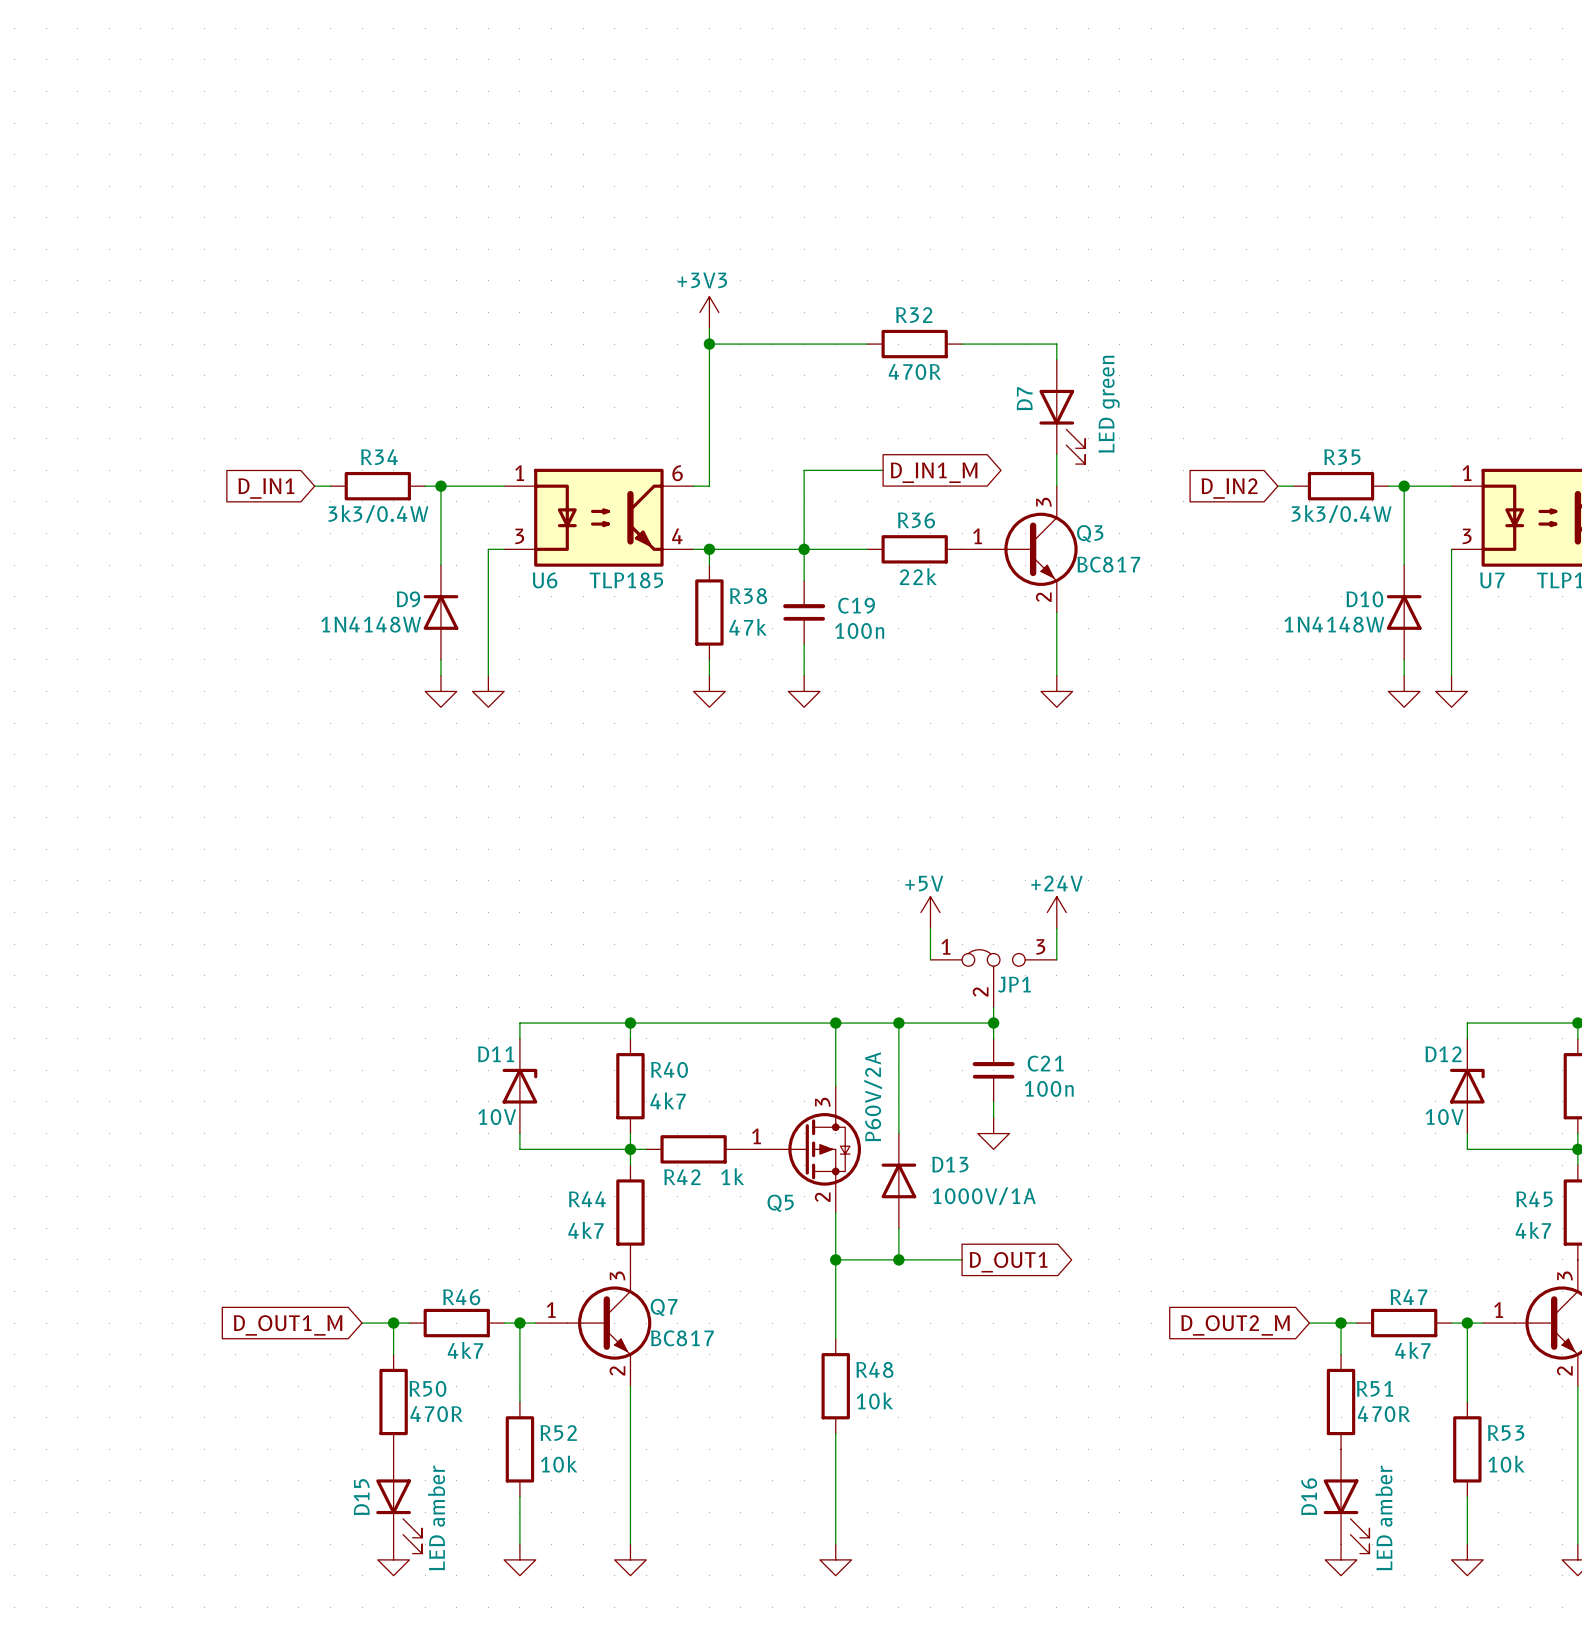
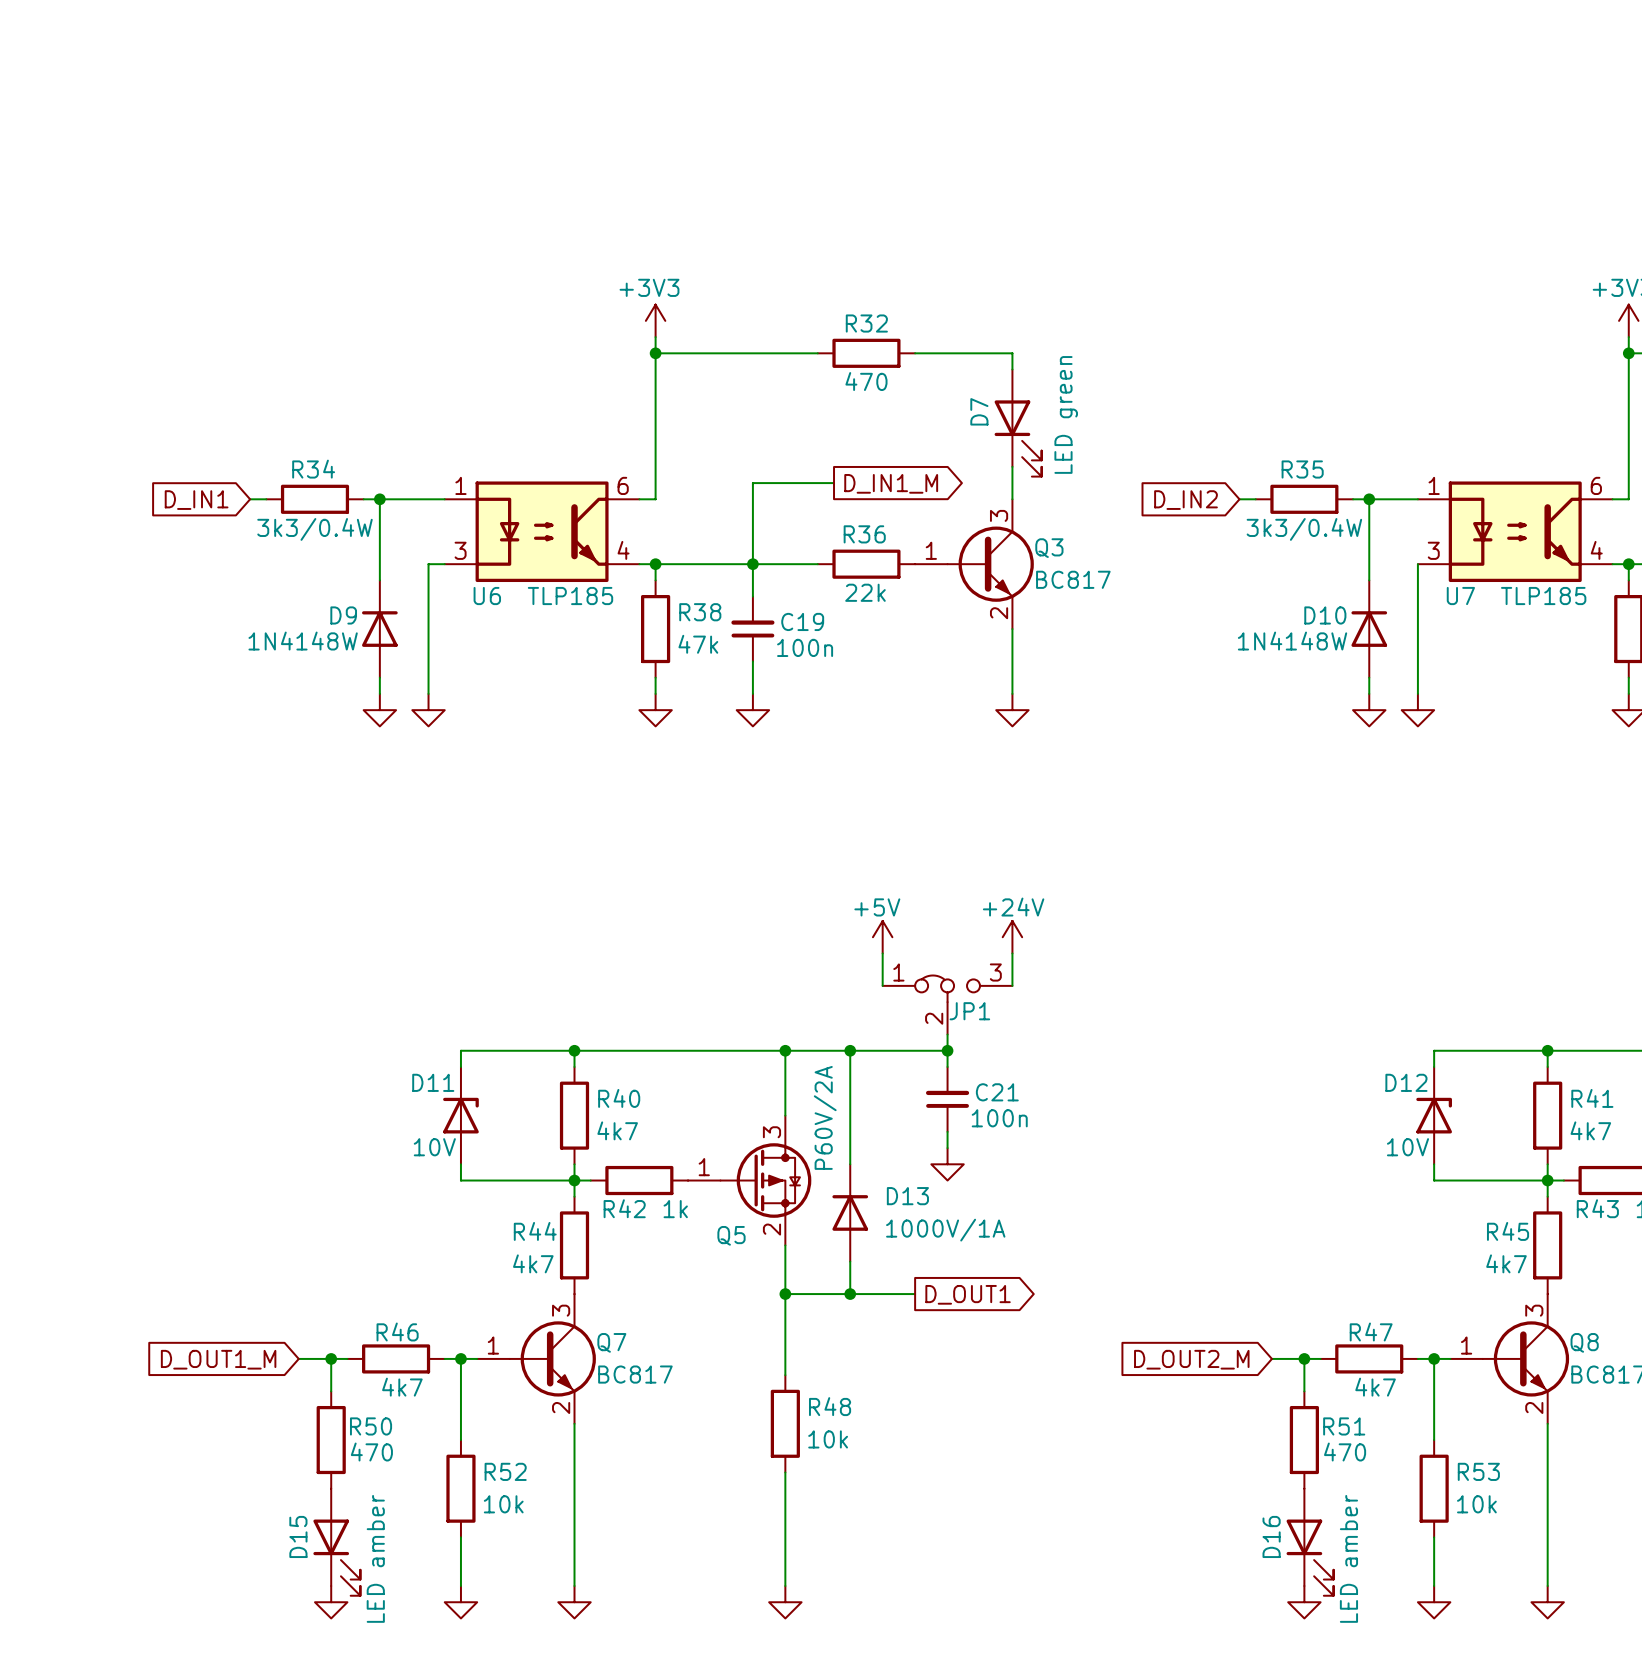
R32 value: 470R (914, 371) -> 470 (866, 381)
R50 value: 470R (436, 1414) -> 470 (371, 1452)
R51 value: 470R (1383, 1414) -> 470 (1345, 1452)

